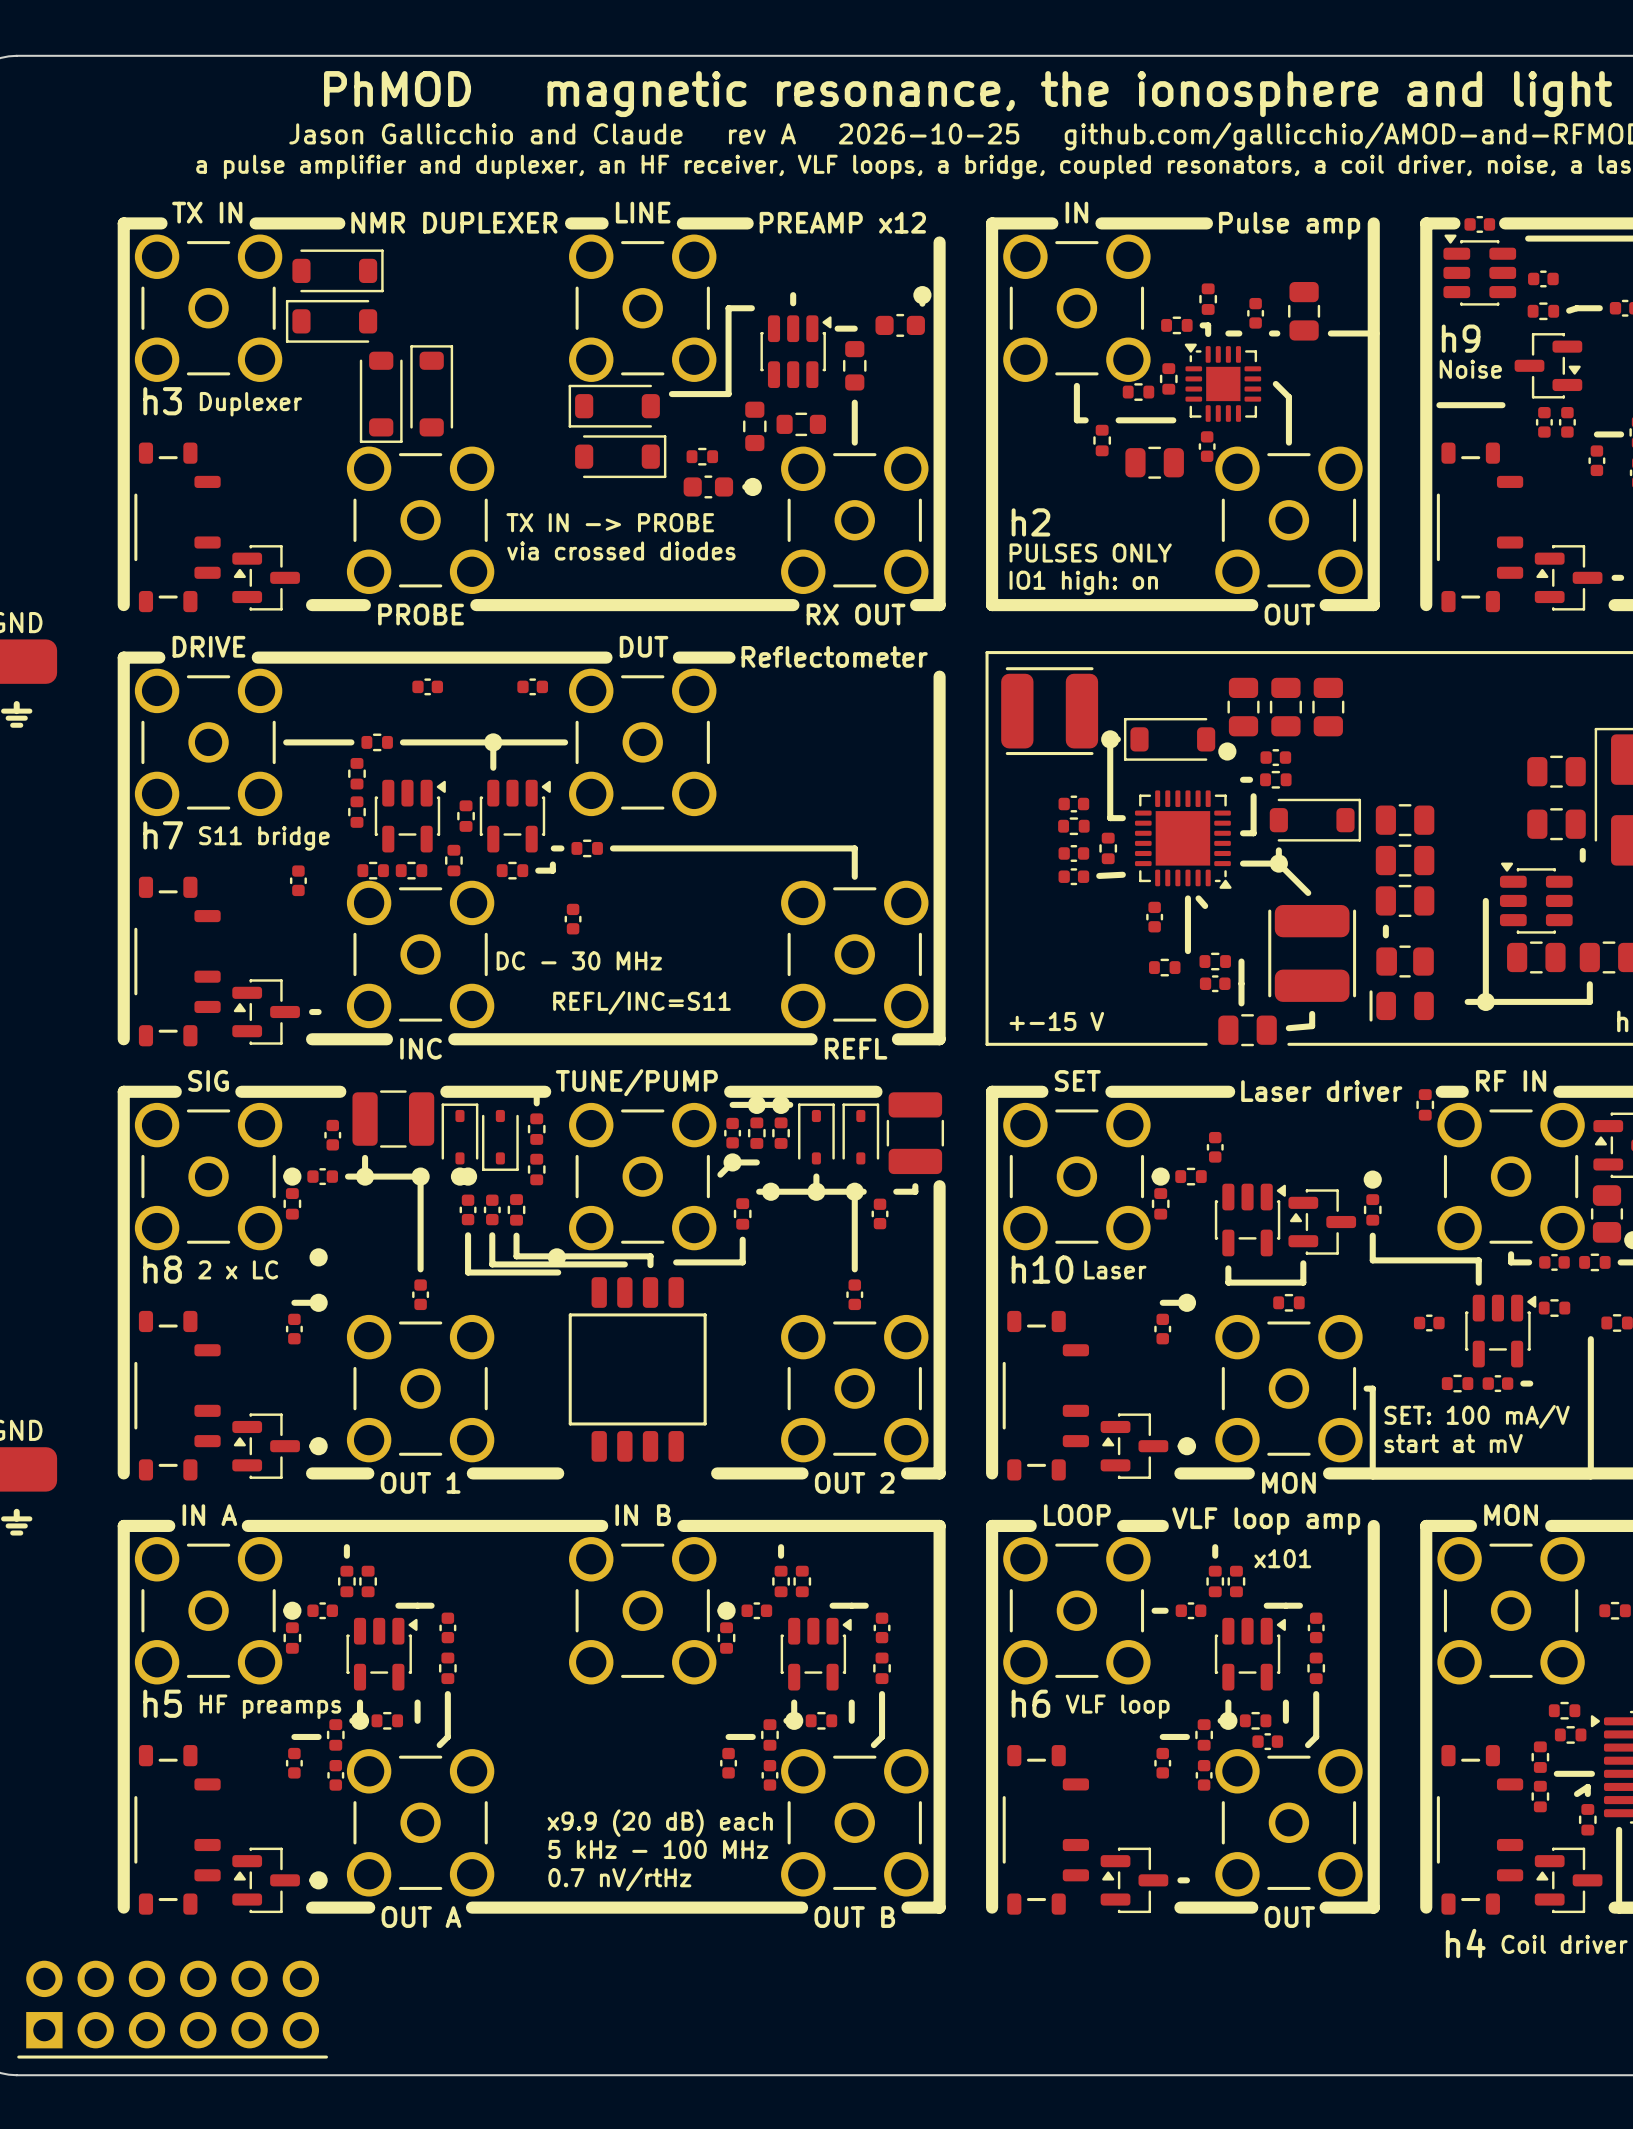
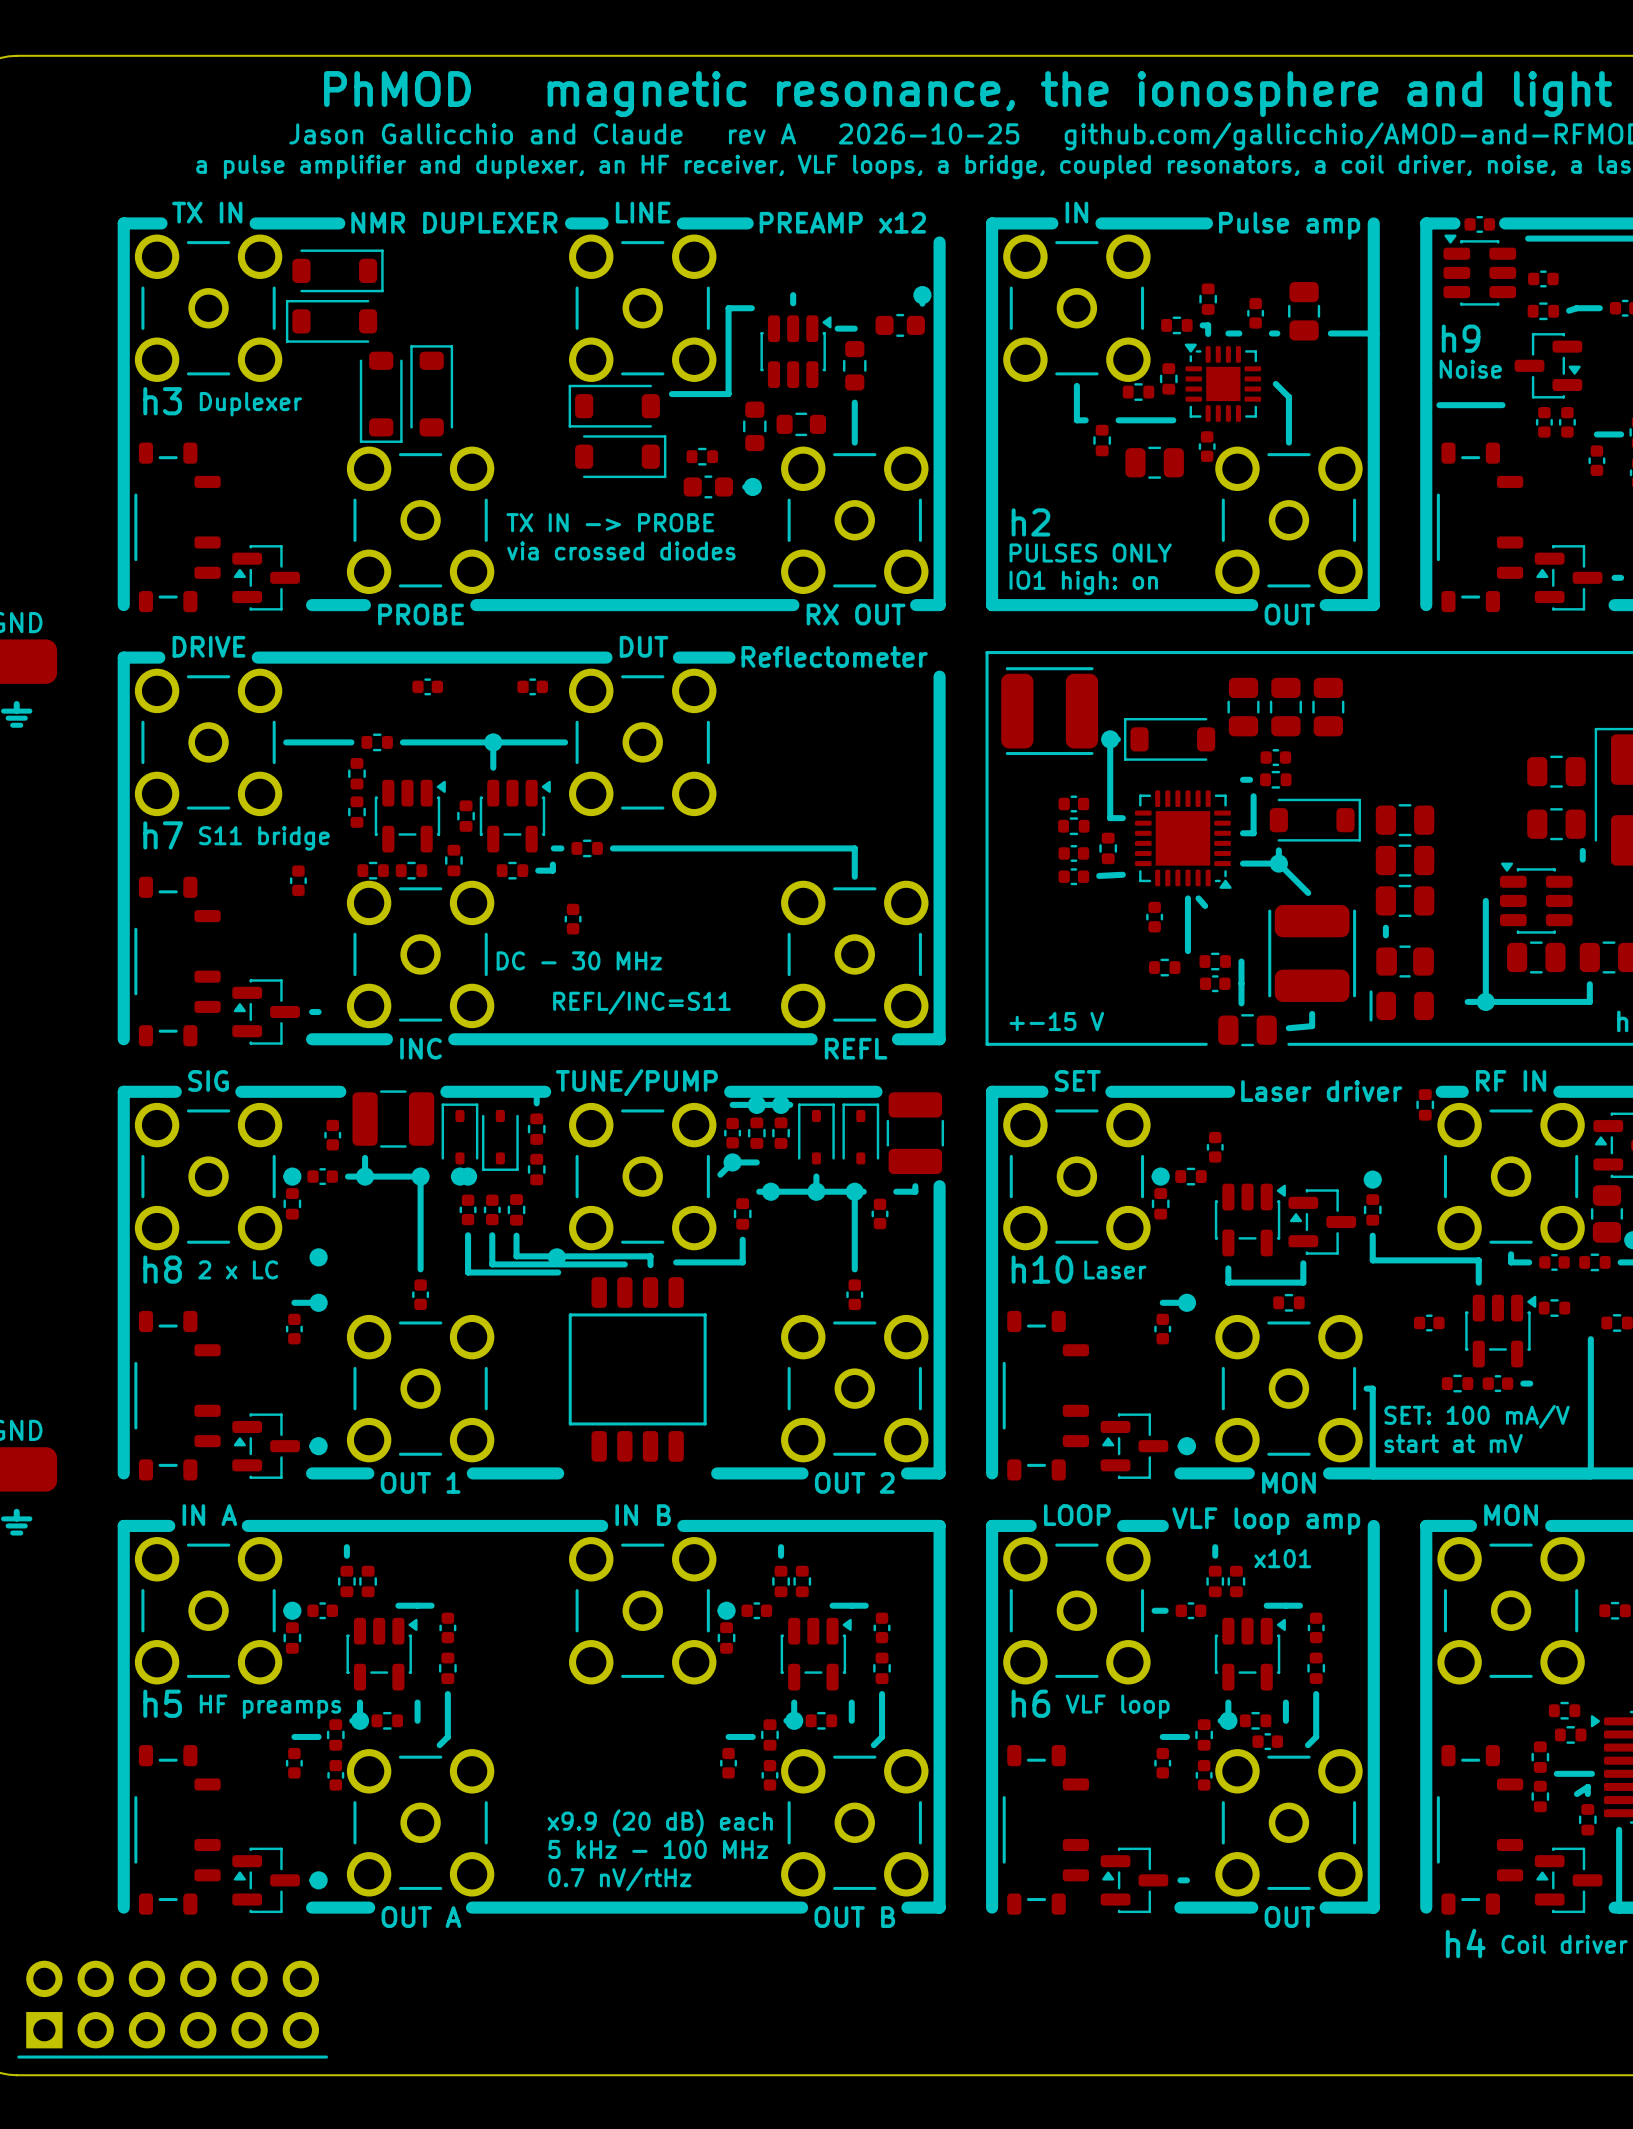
drawing: [1218, 742, 1237, 761] -> none

